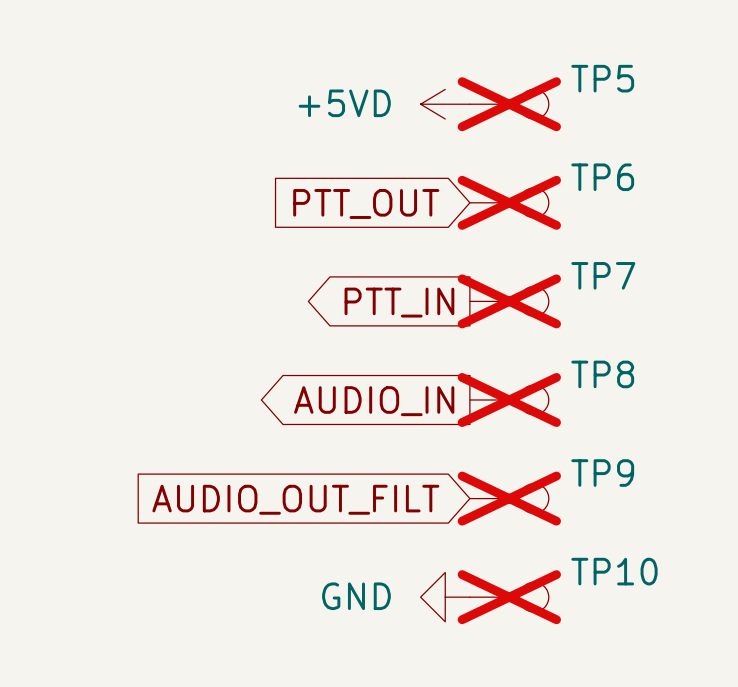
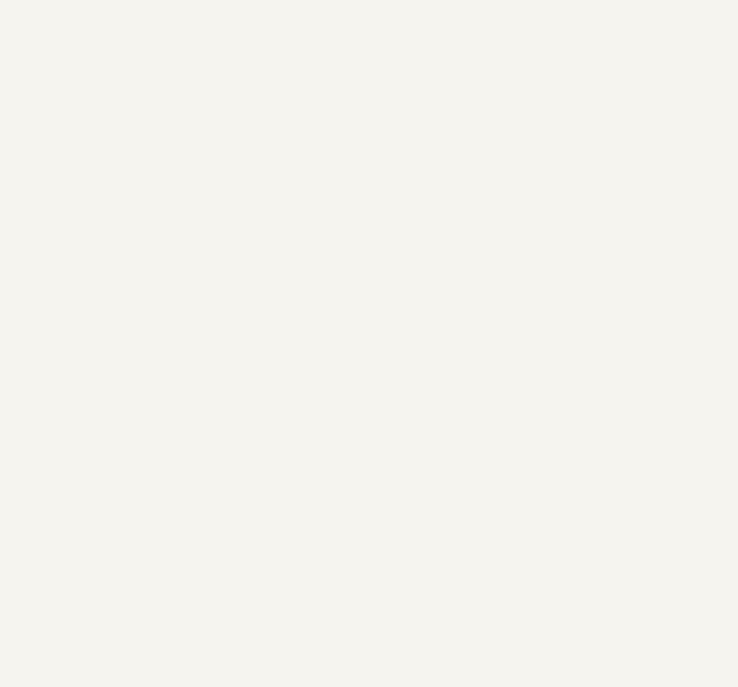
power symbol: +5VD (445, 104) -> none
TP5: (509, 104) -> none
TP6: (509, 202) -> none
global label: PTT_OUT (366, 203) -> none
TP7: (509, 301) -> none
global label: PTT_IN (399, 302) -> none
TP8: (509, 399) -> none
global label: AUDIO_IN (374, 401) -> none
TP9: (509, 498) -> none
global label: AUDIO_OUT_FILT (295, 499) -> none
power symbol: GND (445, 597) -> none
TP10: (509, 597) -> none

